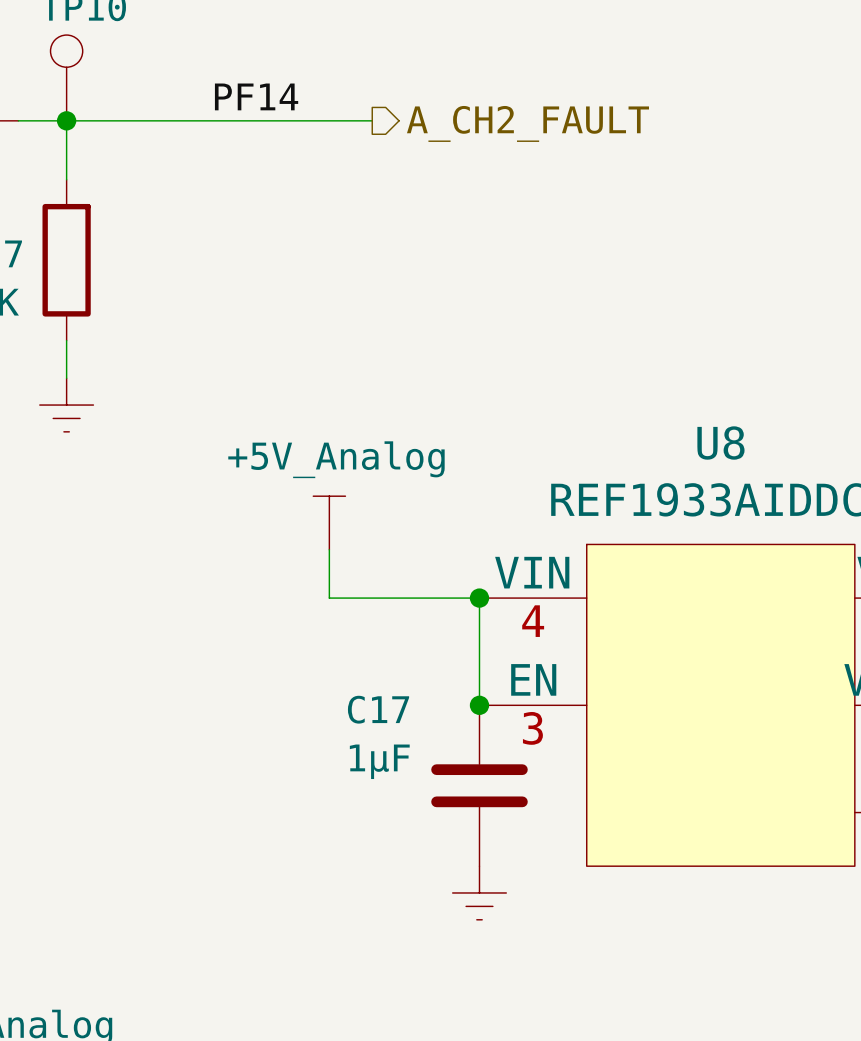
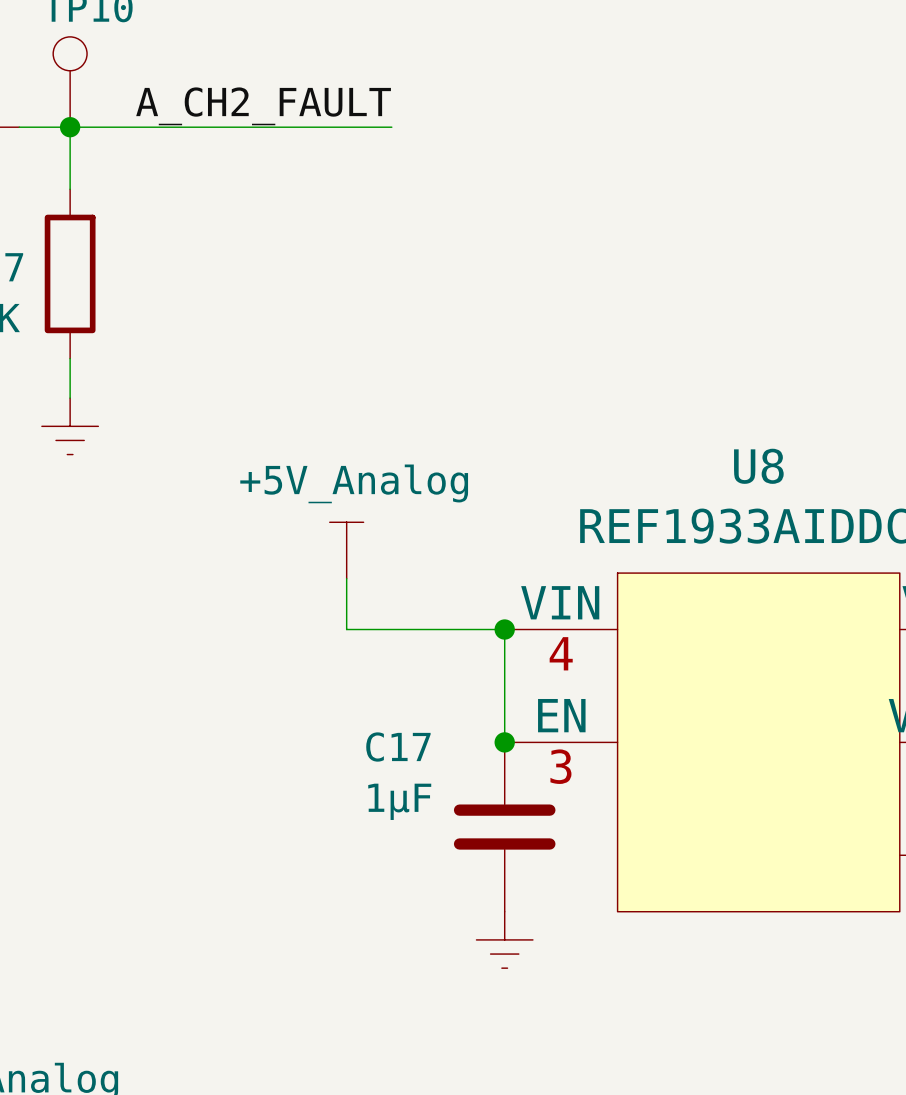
label: PF14 (256, 96) -> none
label: none -> A_CH2_FAULT (263, 106)
hierarchical label: A_CH2_FAULT (527, 123) -> none

